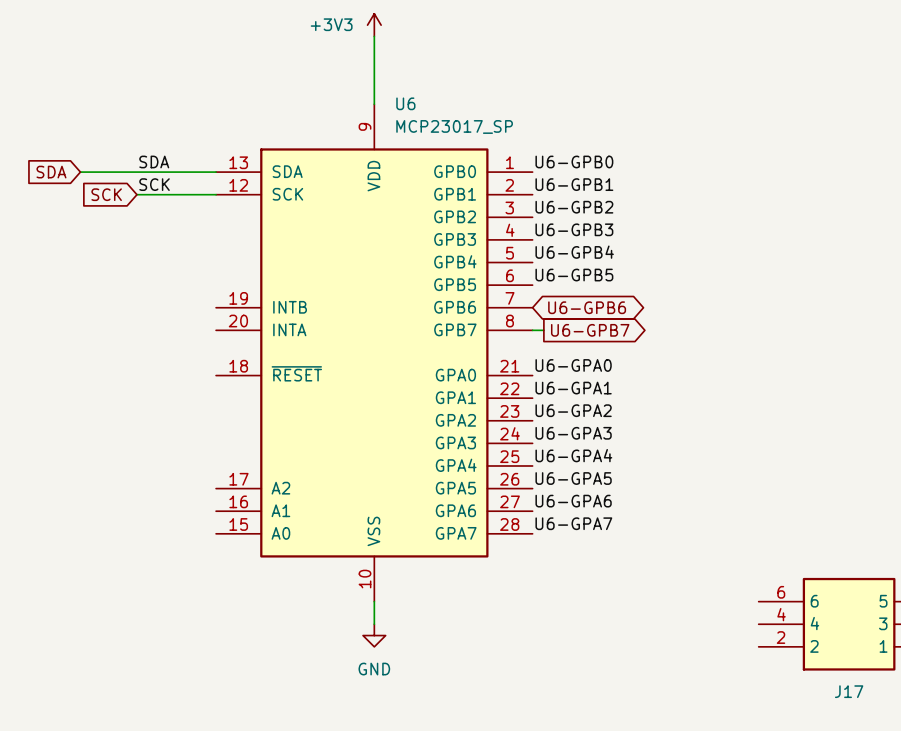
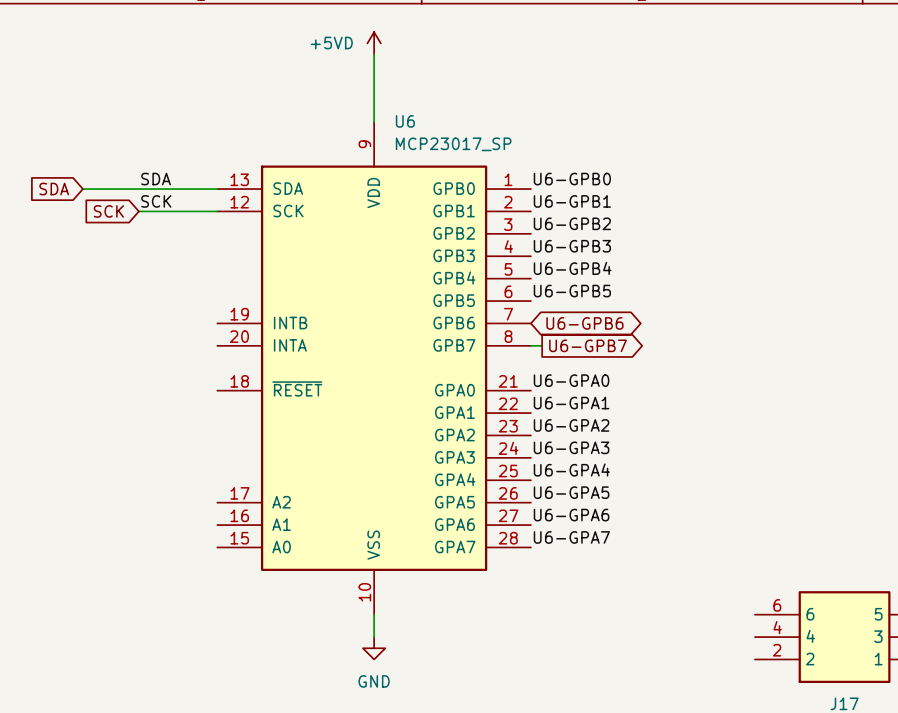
power symbol: +3V3 (374, 25) -> +5VD (374, 43)

